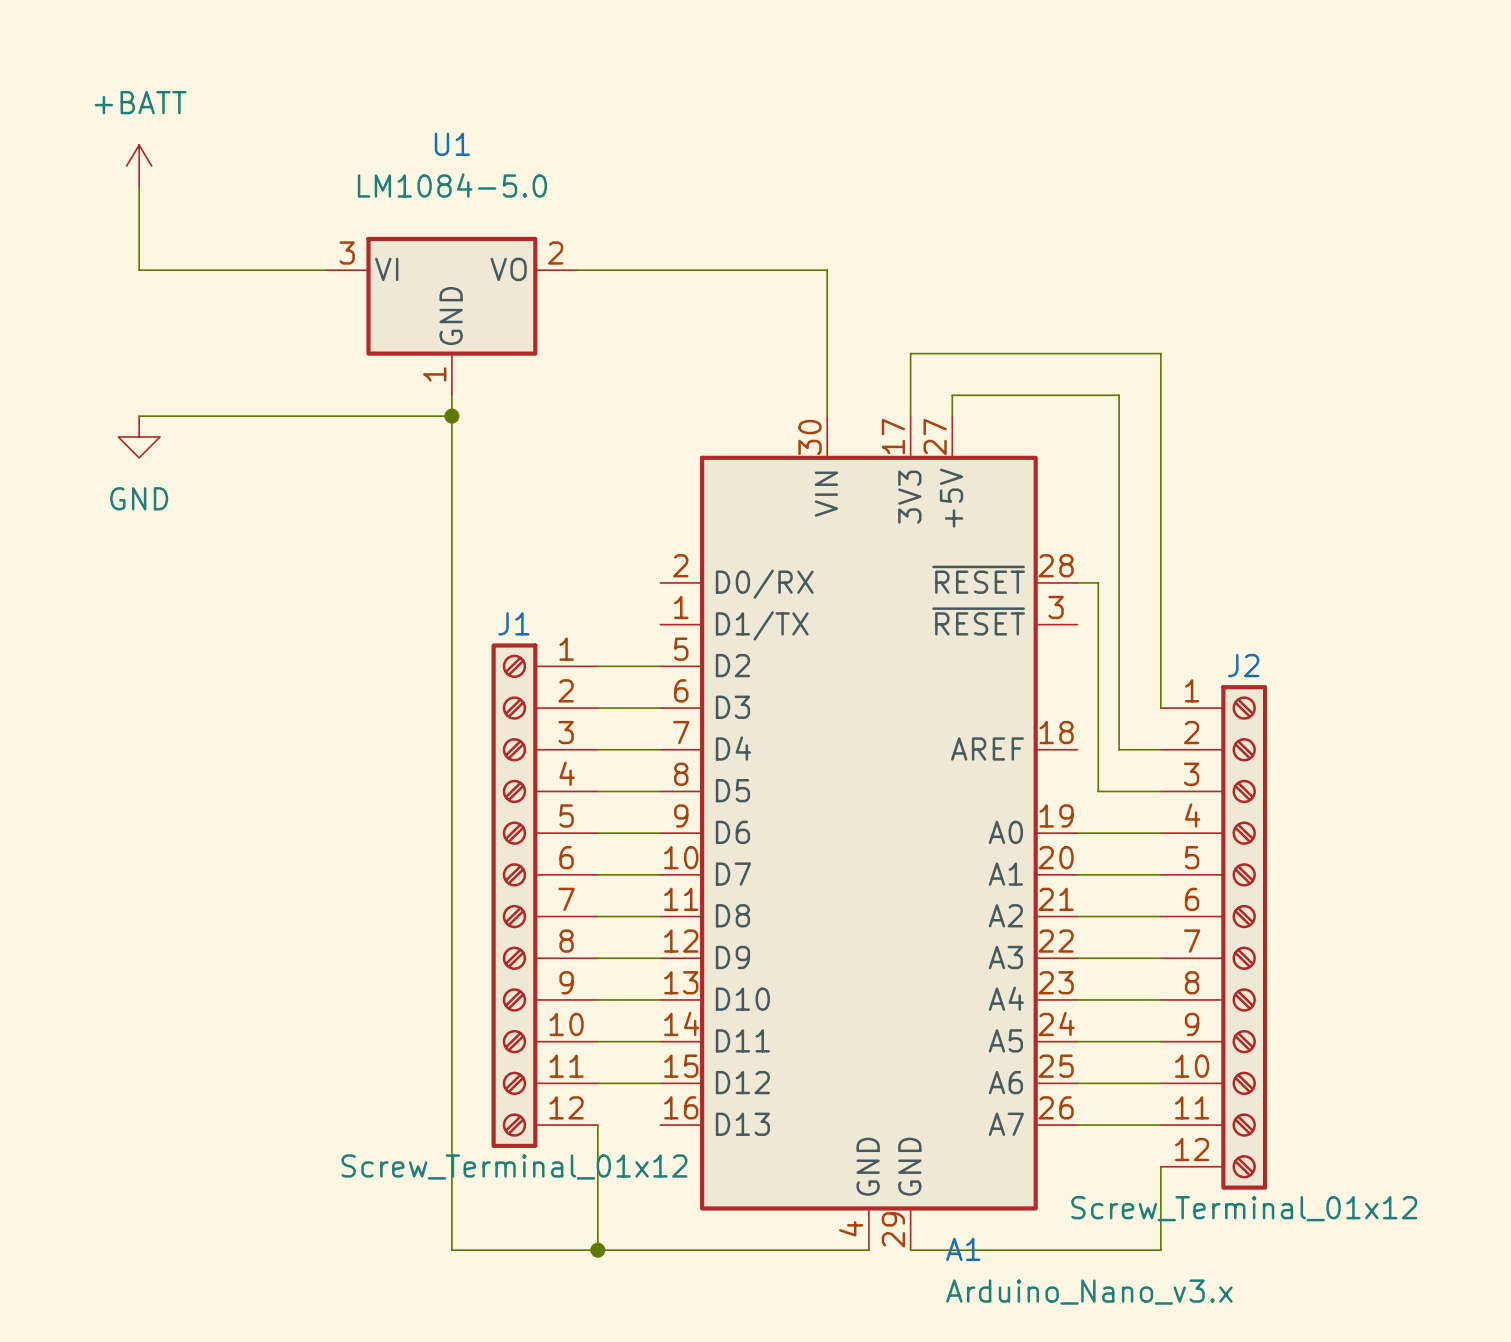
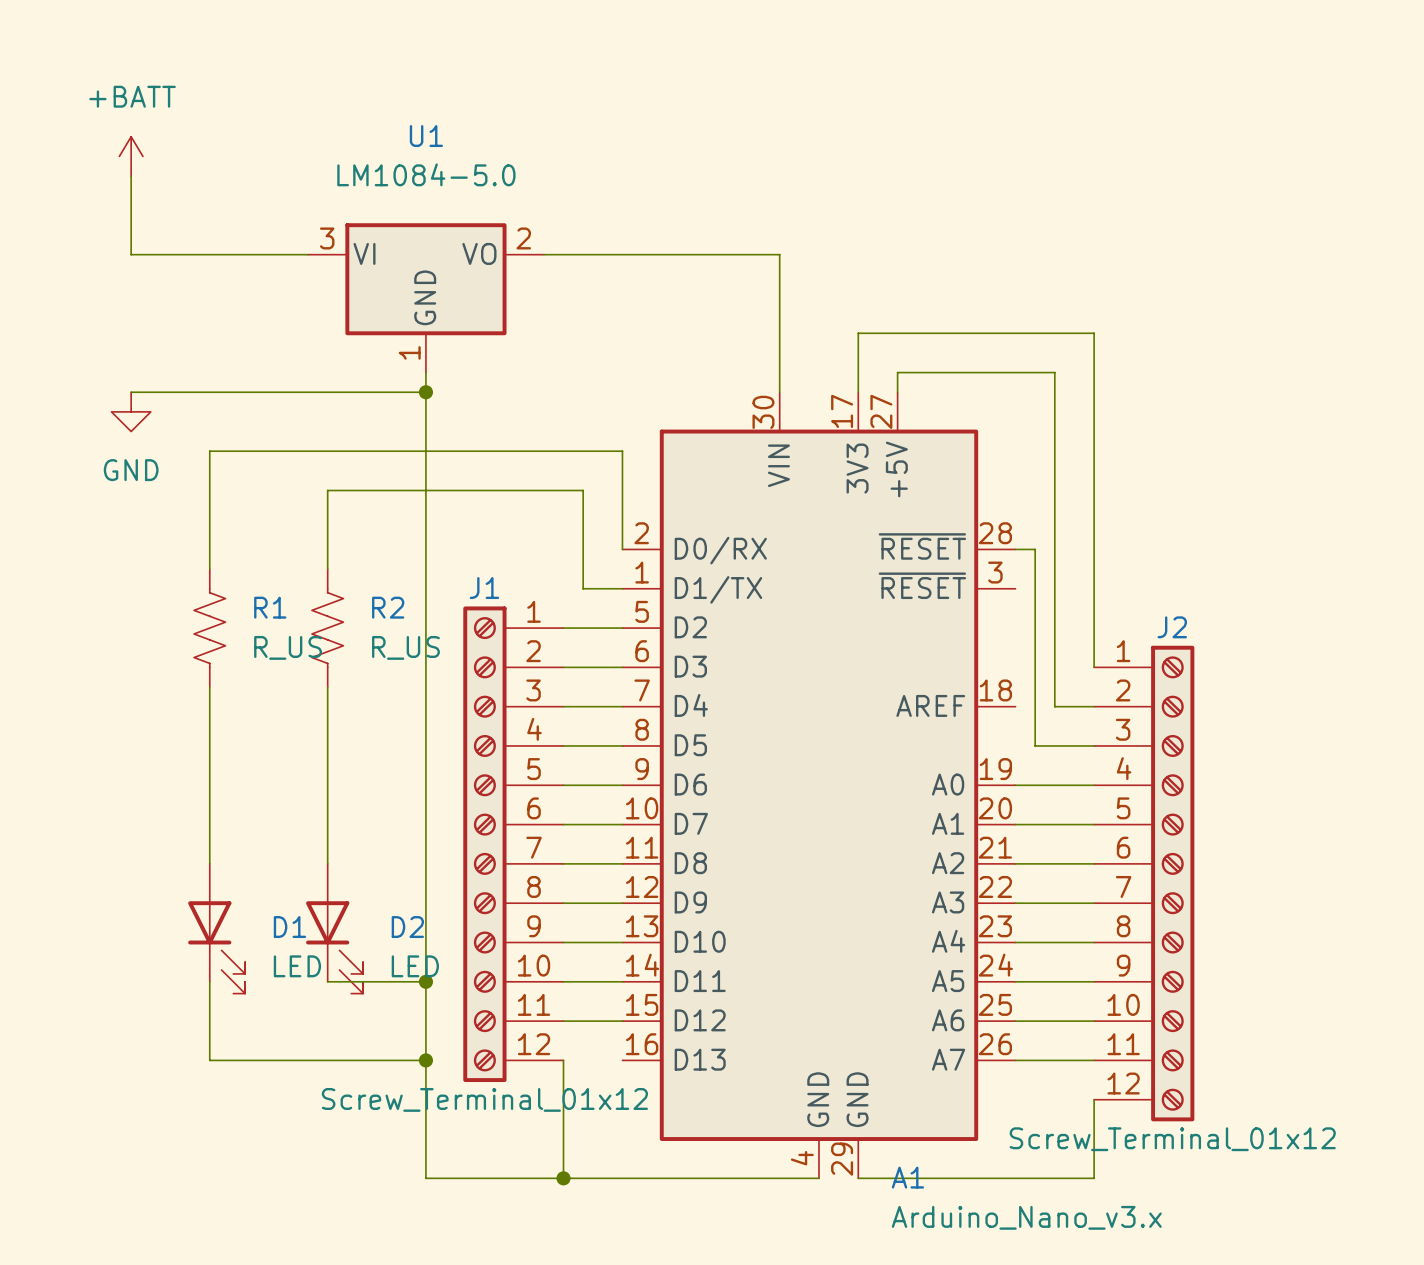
wire: none -> (622, 549) (622, 451) (209, 451) (209, 569)
wire: none -> (327, 569) (327, 490) (583, 490) (583, 588) (622, 588)
R1: none -> R_US (209, 628)
R2: none -> R_US (327, 628)
wire: none -> (209, 687) (209, 863)
wire: none -> (327, 687) (327, 863)
D1: none -> LED (216, 928)
D2: none -> LED (334, 928)
wire: none -> (209, 981) (209, 1060) (425, 1060)
wire: none -> (327, 981) (425, 981)
junction: none -> (425, 981)
junction: none -> (425, 1060)

